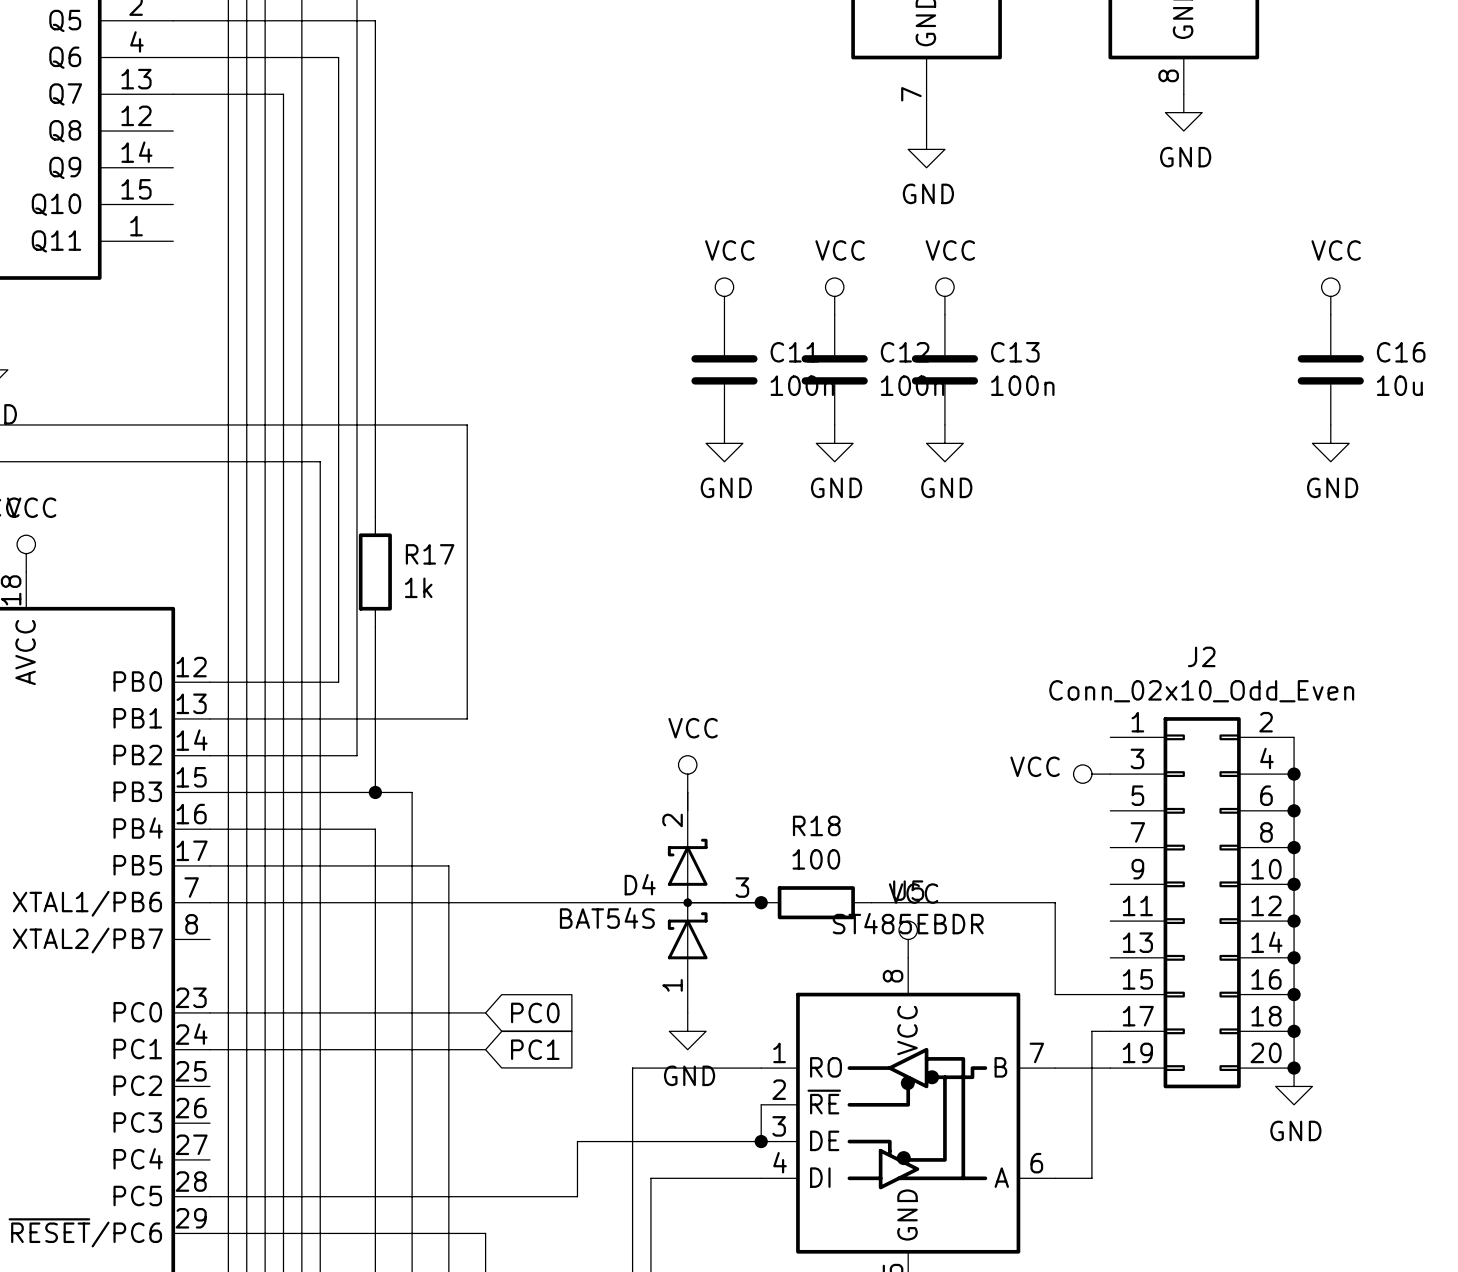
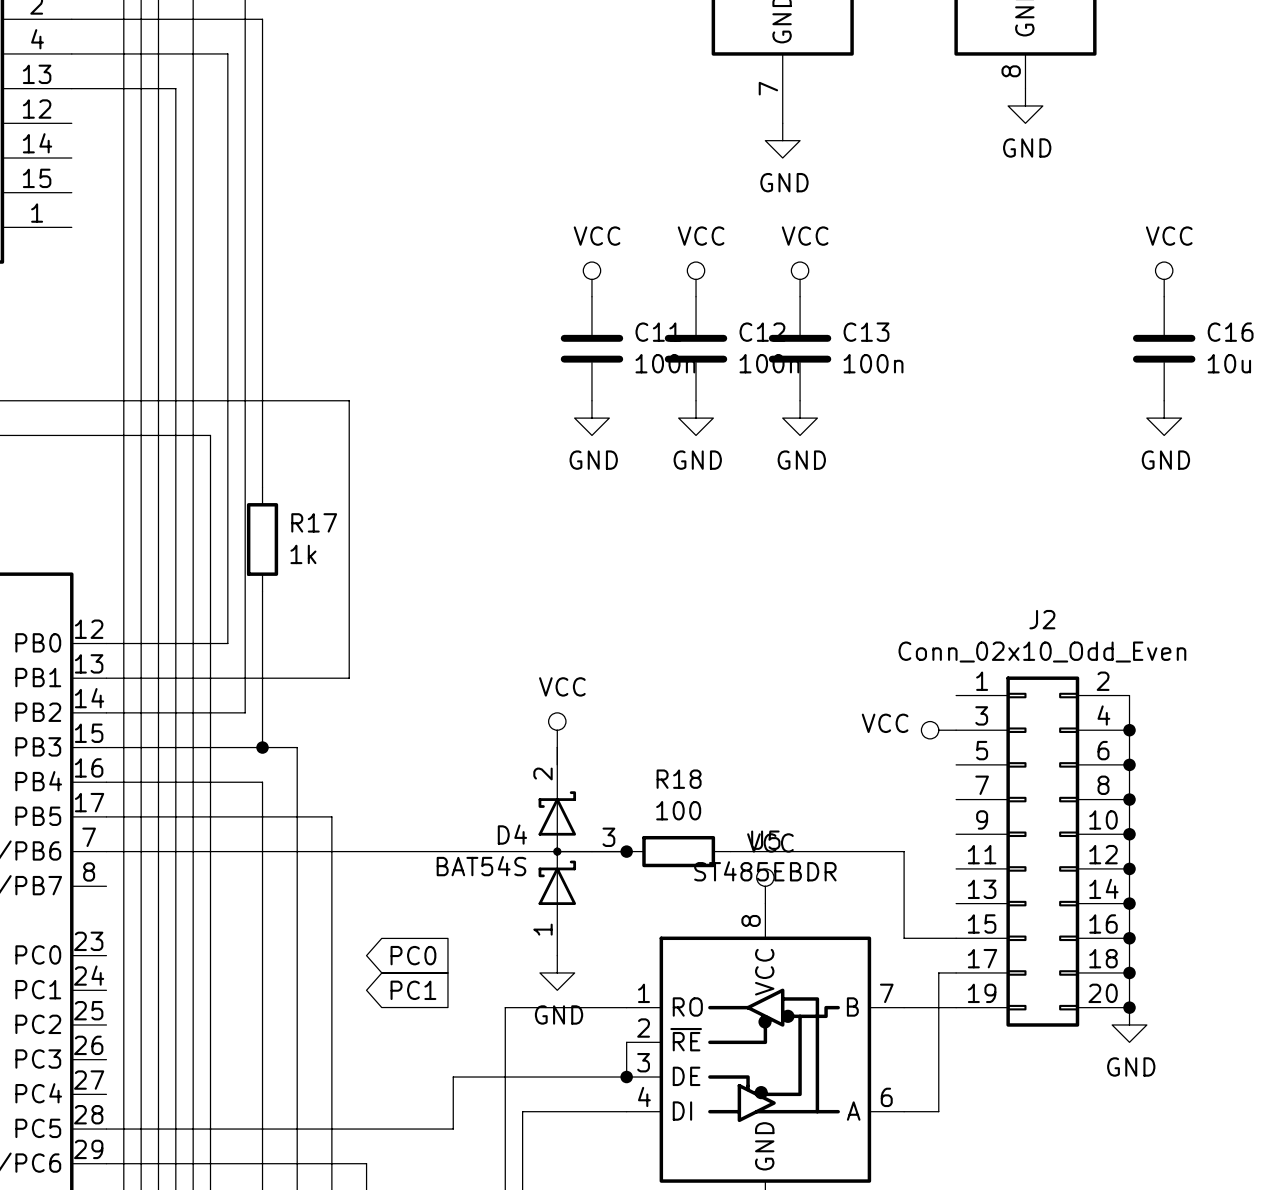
wire: (209, 1012) (485, 1012) -> none
wire: (209, 1049) (485, 1049) -> none

